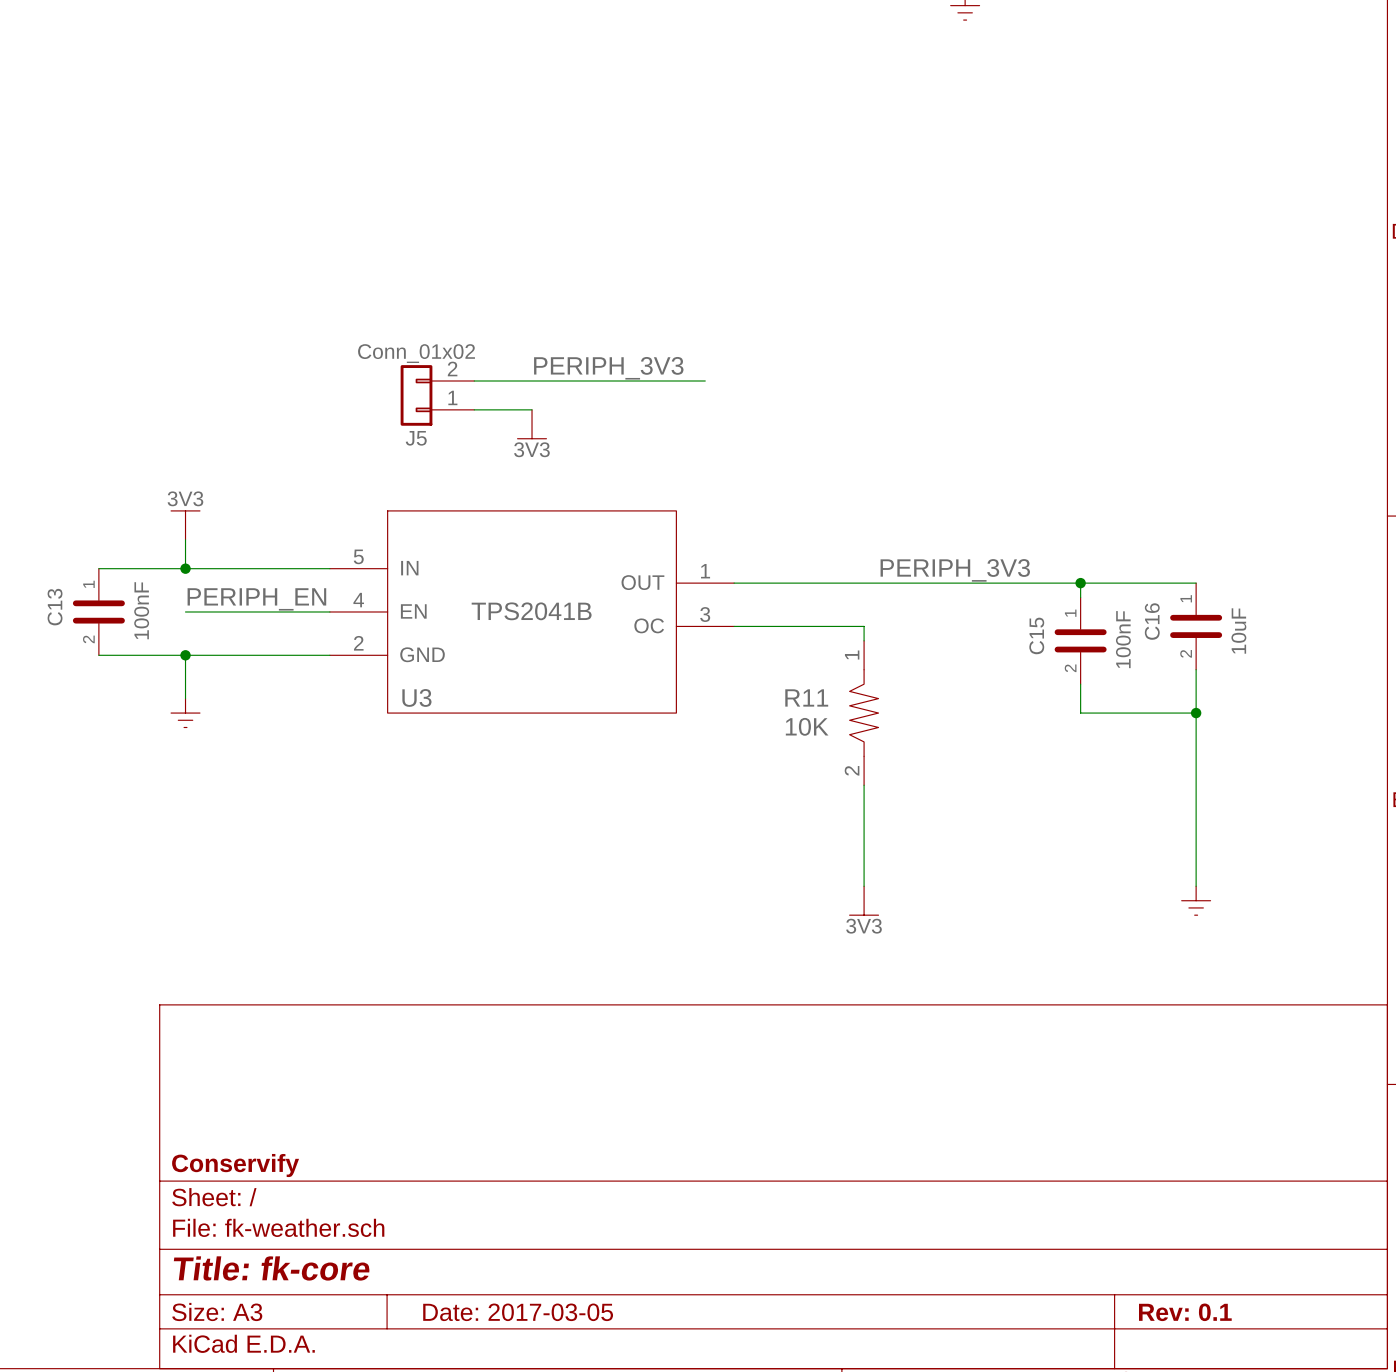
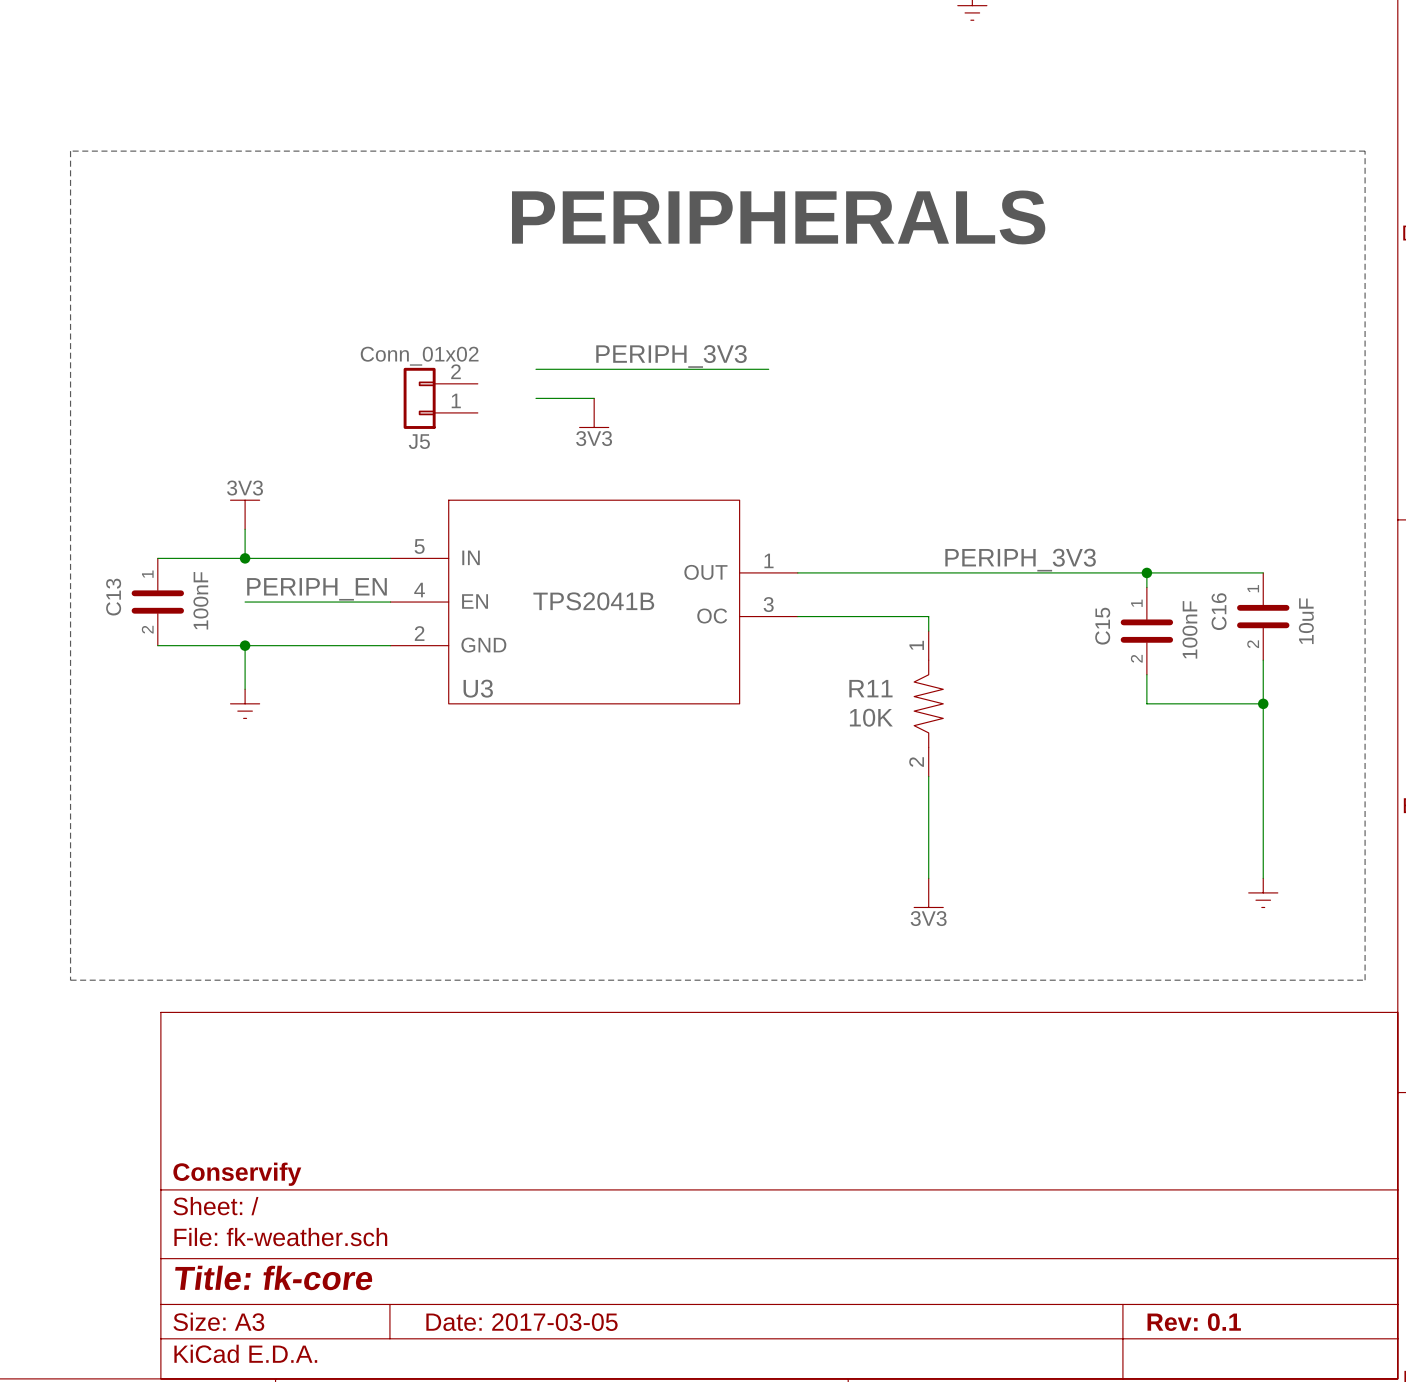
line: none -> (70, 151) (1365, 151) (1365, 980) (70, 980) (70, 151)
text: none -> PERIPHERALS (778, 217)
label position: PERIPH_3V3 (608, 368) -> PERIPH_3V3 (671, 356)
wire: (474, 380) (705, 380) -> (535, 369) (768, 369)
wire: (474, 409) (532, 409) -> (535, 398) (594, 398)
power symbol position: 3V3 (532, 424) -> 3V3 (594, 412)
power symbol position: 3V3 (185, 525) -> 3V3 (245, 514)
wire: (185, 539) (185, 568) -> (245, 529) (245, 558)
junction: none -> (245, 558)
wire: (98, 568) (329, 568) -> (157, 558) (390, 558)
junction: (185, 568) -> none
label position: PERIPH_3V3 (955, 570) -> PERIPH_3V3 (1020, 560)
wire: (734, 583) (1196, 583) -> (797, 572) (1263, 572)
wire: (1080, 583) (1080, 597) -> (1146, 572) (1146, 587)
junction position: (1080, 583) -> (1146, 572)
label position: PERIPH_EN (256, 599) -> PERIPH_EN (317, 589)
C13 position: (98, 611) -> (157, 602)
wire: (185, 611) (329, 611) -> (245, 602) (390, 602)
U3 position: (532, 611) -> (594, 602)
wire: (734, 626) (864, 626) (864, 640) -> (797, 616) (928, 616) (928, 631)
C16 position: (1196, 626) -> (1263, 616)
junction: none -> (245, 645)
C15 position: (1080, 640) -> (1146, 631)
wire: (98, 655) (329, 655) -> (157, 645) (390, 645)
wire: (185, 655) (185, 698) -> (245, 645) (245, 689)
junction: (185, 655) -> none
wire: (1196, 669) (1196, 886) -> (1263, 660) (1263, 878)
wire: (1080, 684) (1080, 713) (1196, 713) -> (1146, 674) (1146, 703) (1263, 703)
power symbol position: (185, 713) -> (245, 703)
R11 position: (864, 713) -> (928, 703)
junction position: (1196, 713) -> (1263, 703)
wire: (864, 785) (864, 886) -> (928, 776) (928, 878)
power symbol position: 3V3 (864, 900) -> 3V3 (928, 892)
power symbol position: (1196, 900) -> (1263, 892)

